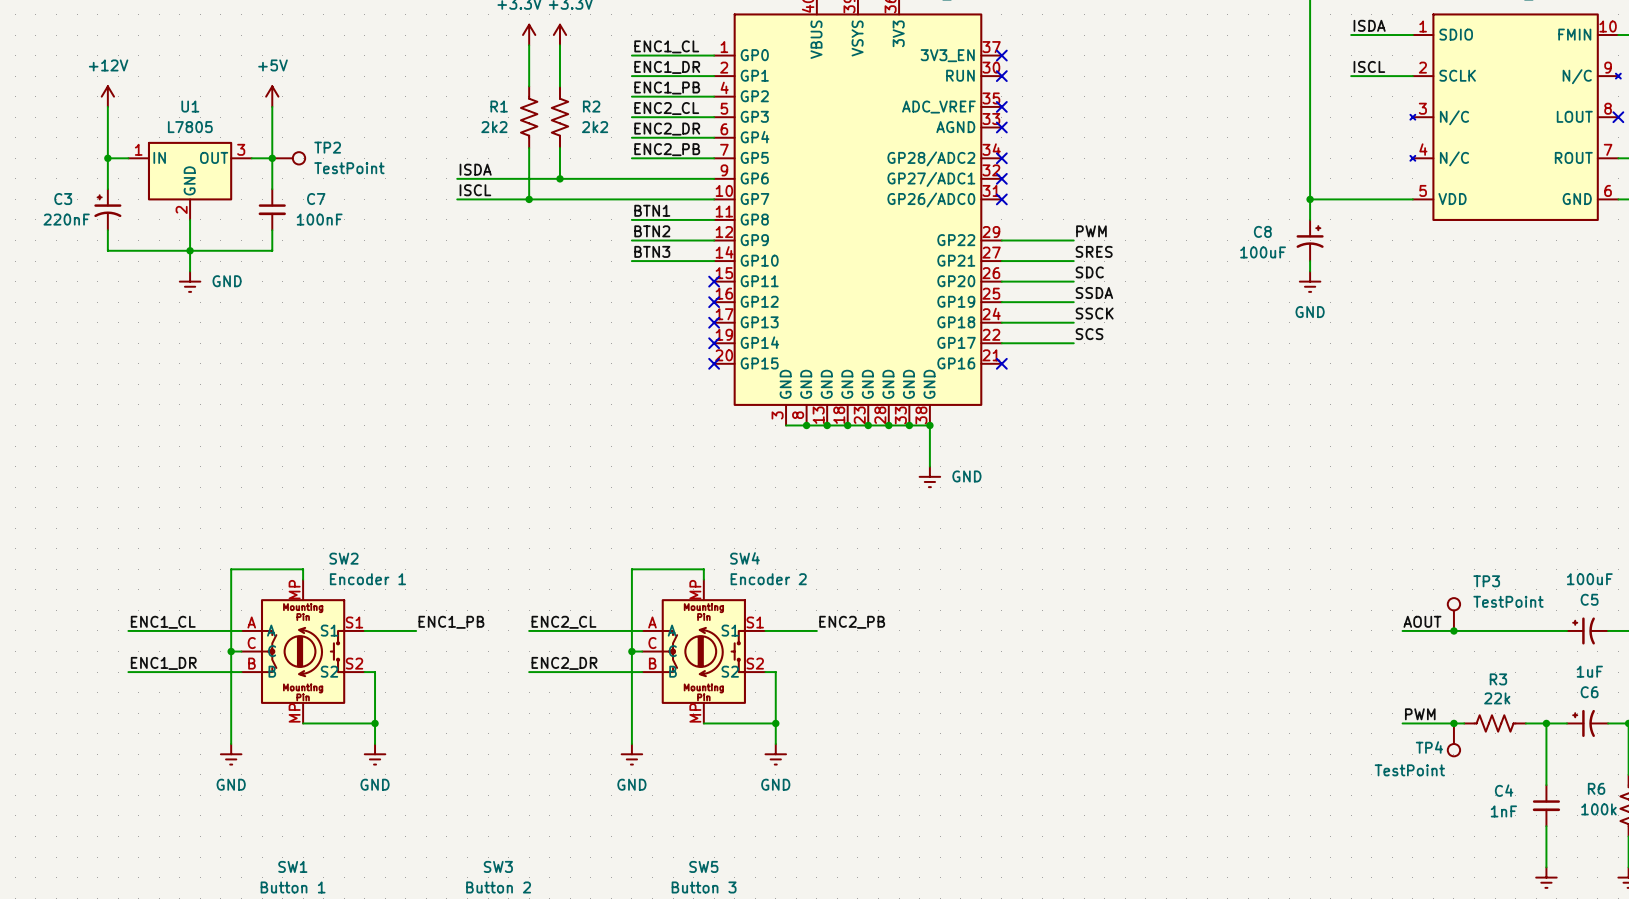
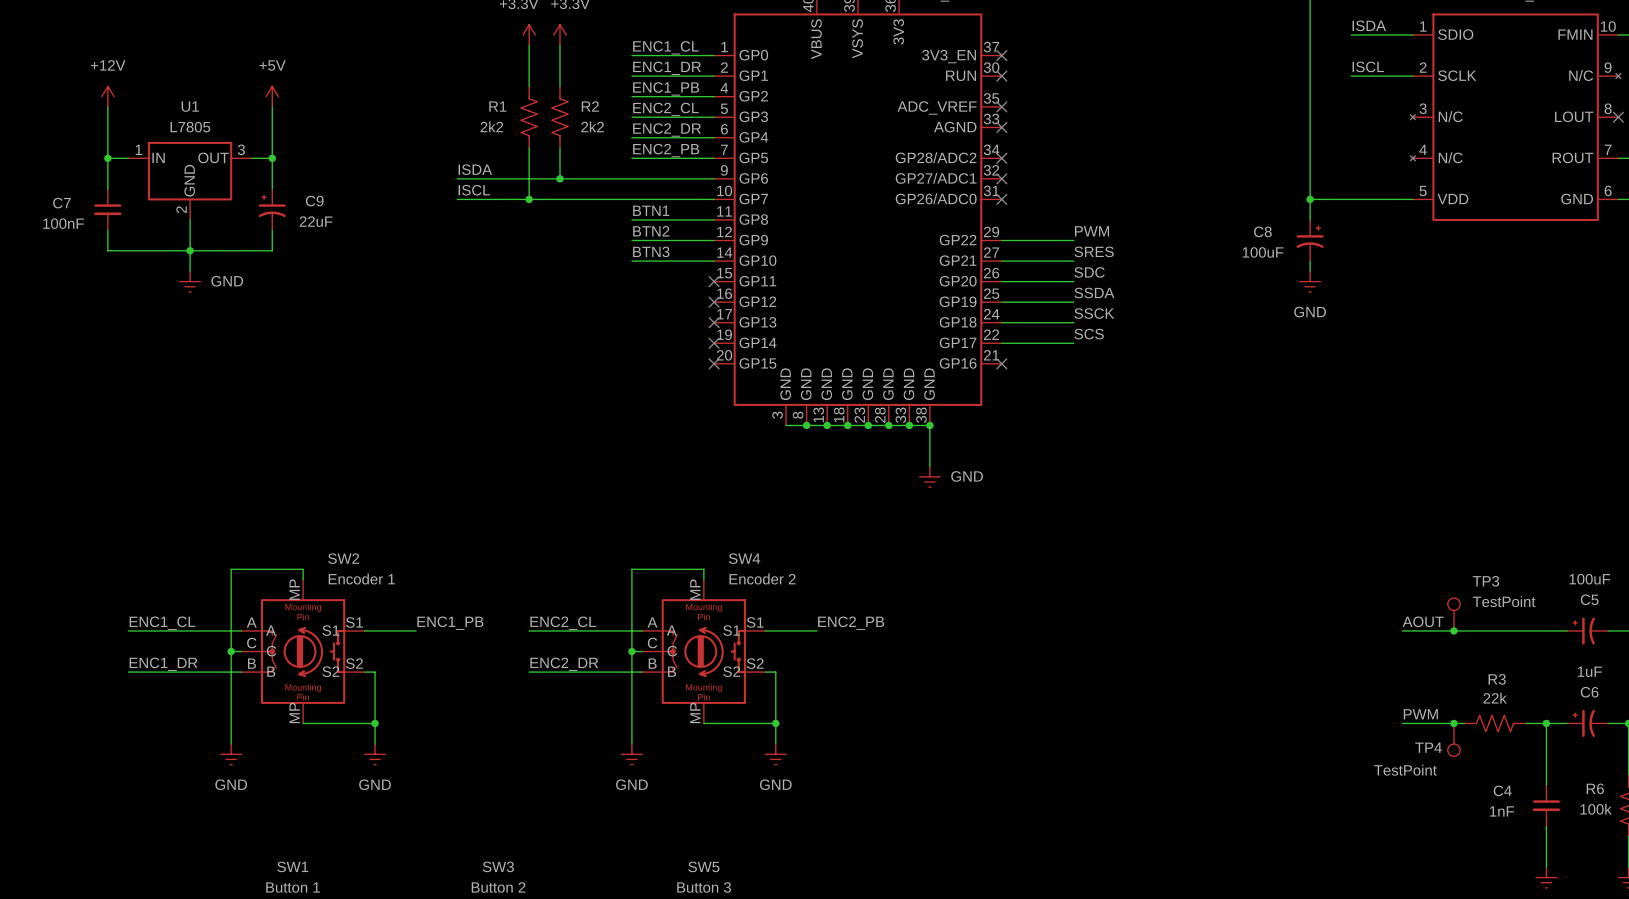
TP2: TestPoint (288, 158) -> none
C7 name position: C7 (316, 199) -> C7 (61, 203)
C3: 220nF (107, 209) -> none
C7 position: (272, 209) -> (107, 209)
C9: none -> 22uF (272, 209)
C7 value position: 100nF (319, 219) -> 100nF (63, 223)

